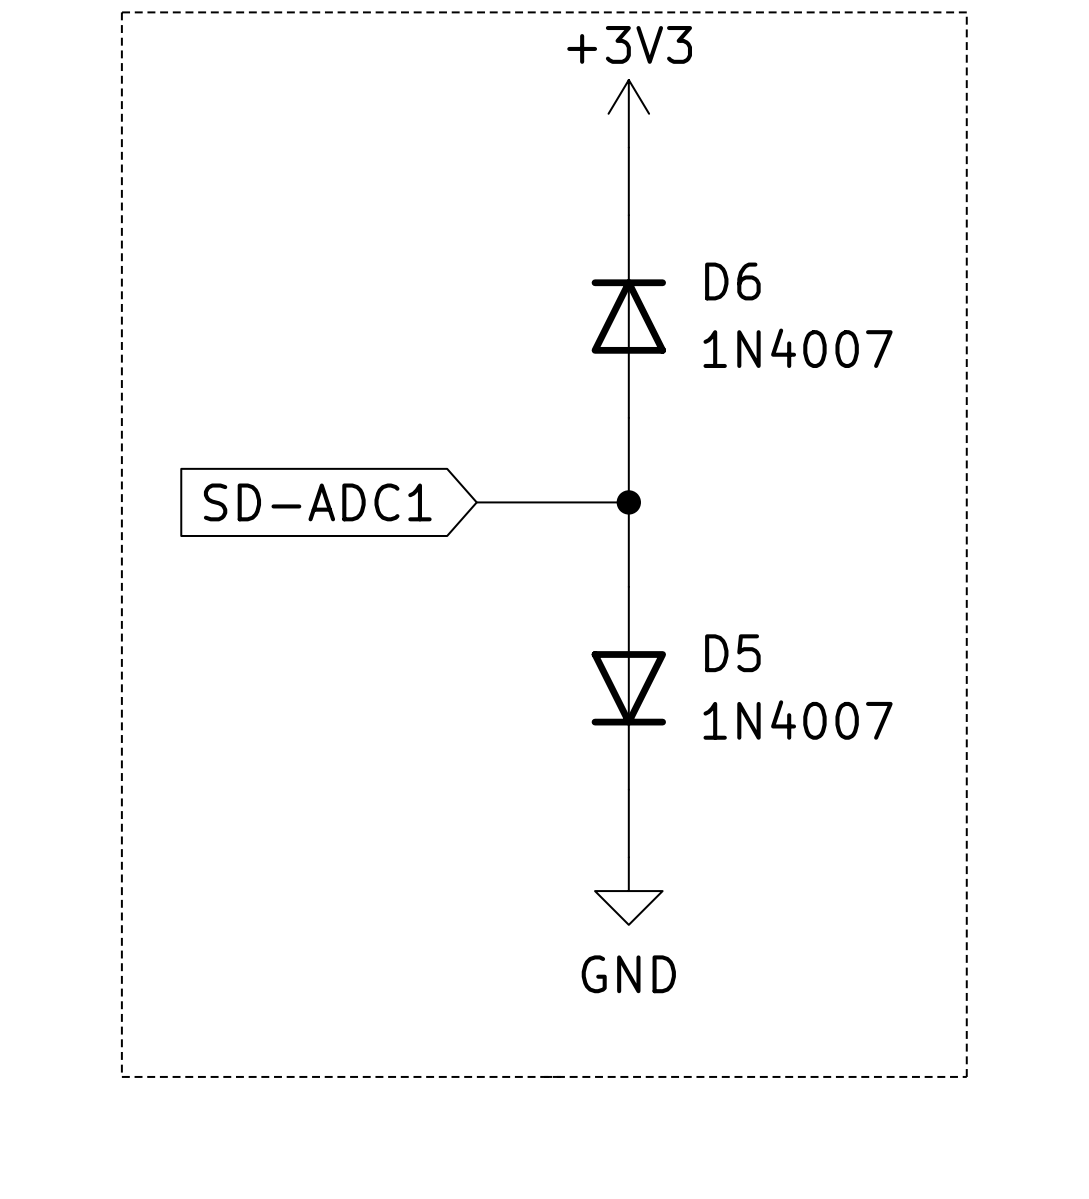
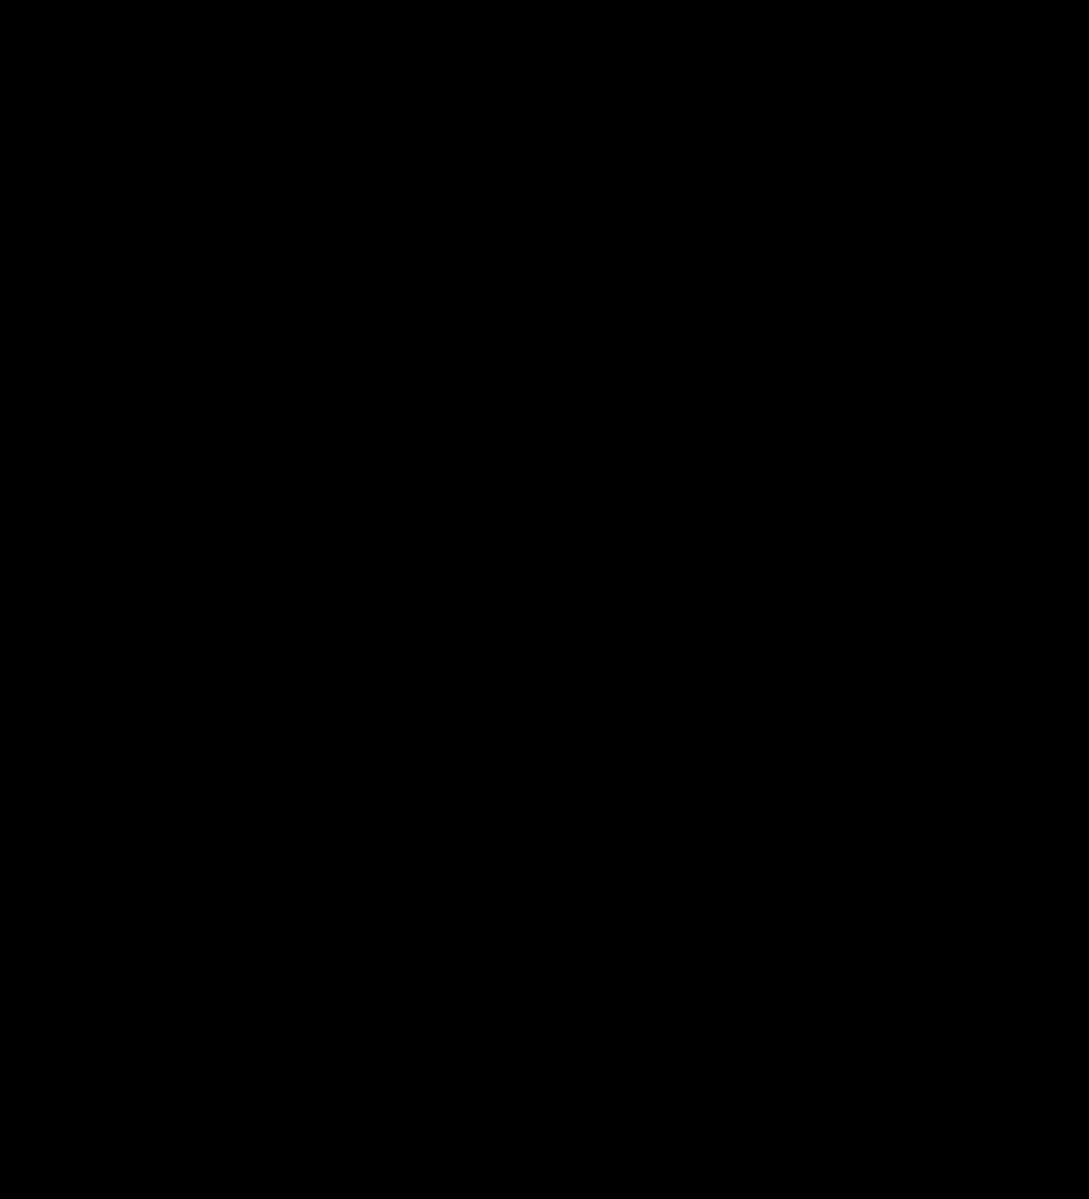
line: (121, 12) (966, 12) (966, 1076) (121, 1076) (121, 12) -> none
power symbol: +3V3 (628, 113) -> none
wire: (628, 147) (628, 215) -> none
D6: 1N4007 (628, 316) -> none
wire: (628, 417) (628, 586) -> none
global label: SD-ADC1 (317, 502) -> none
wire: (476, 502) (628, 502) -> none
junction: (628, 502) -> none
D5: 1N4007 (628, 688) -> none
wire: (628, 789) (628, 857) -> none
power symbol: GND (628, 891) -> none

